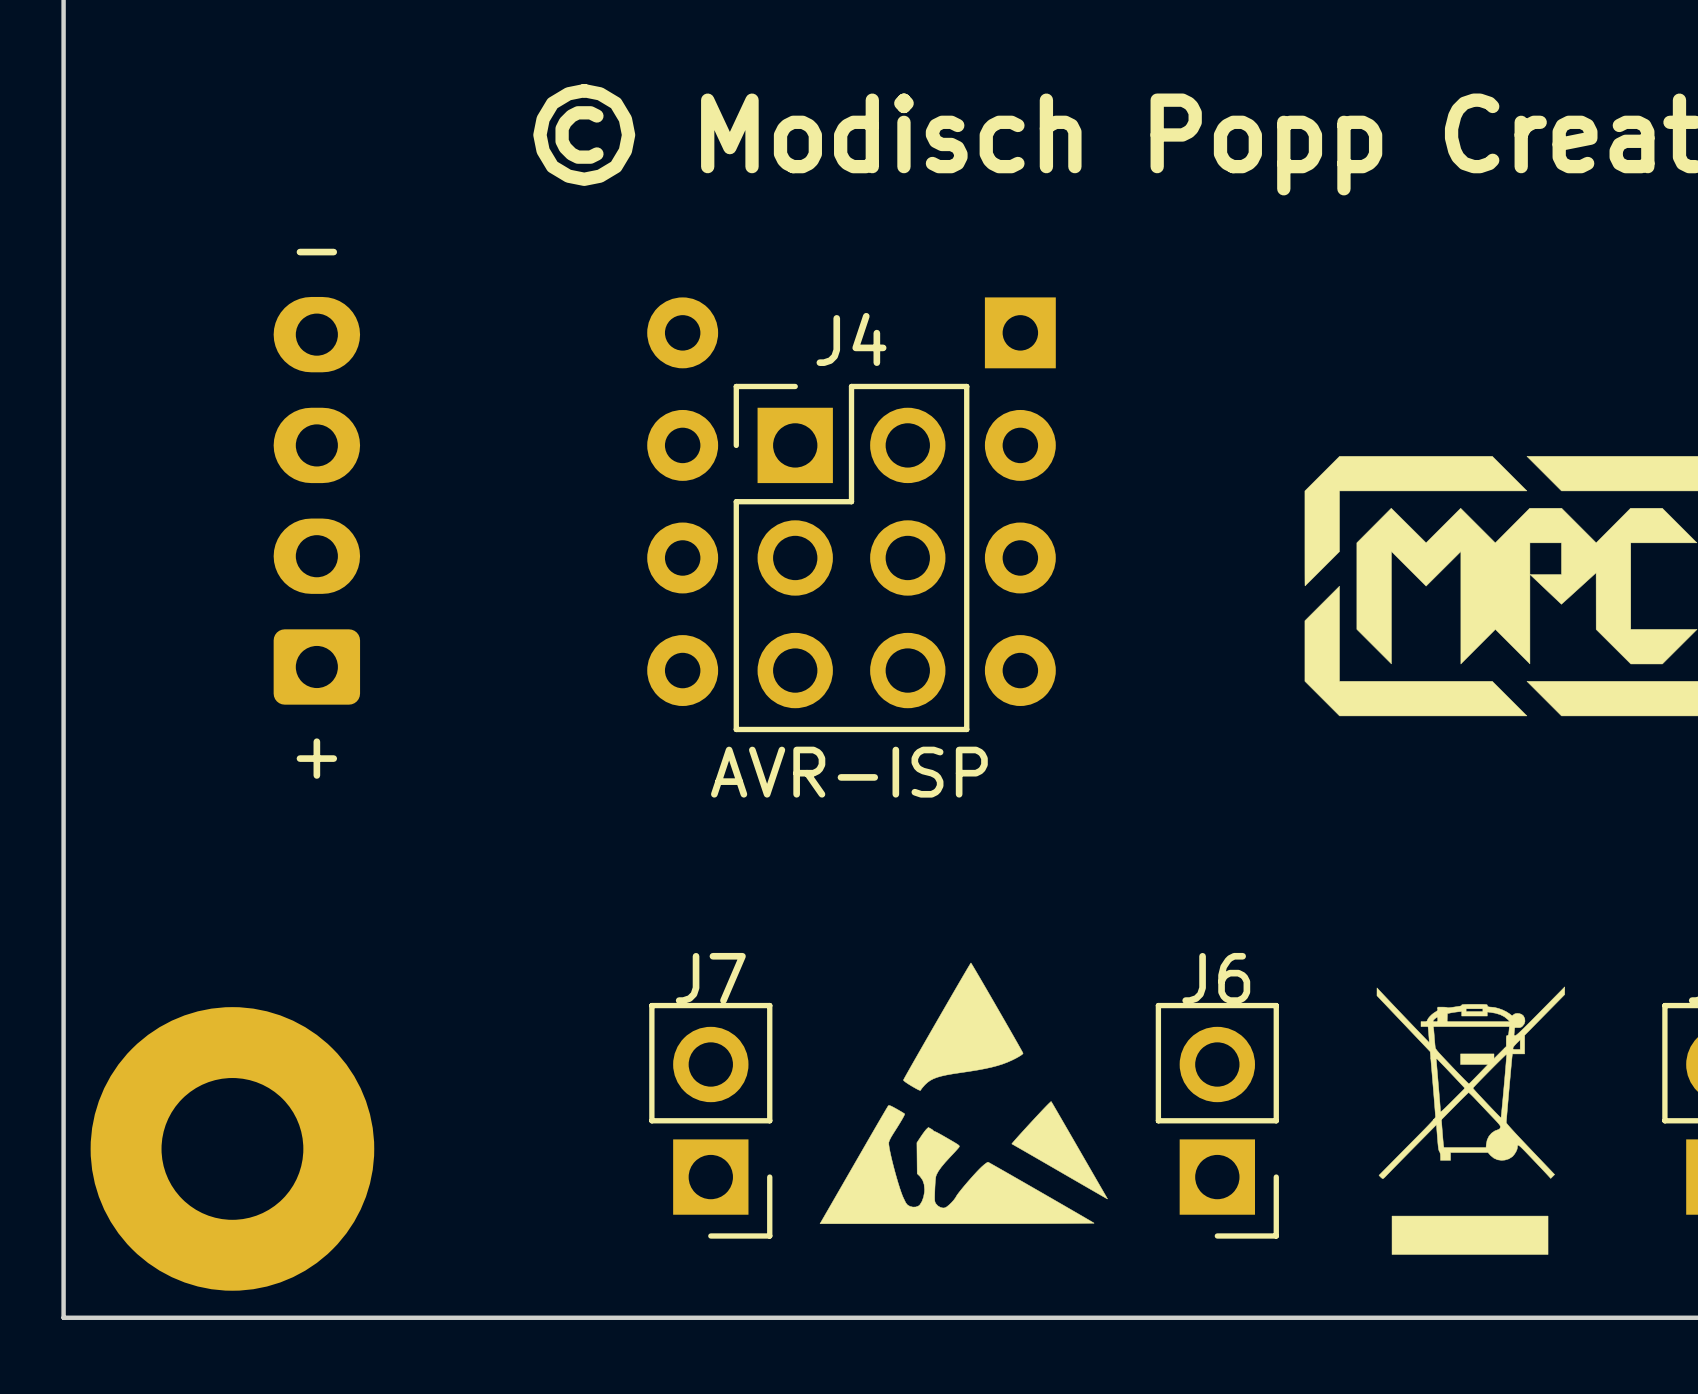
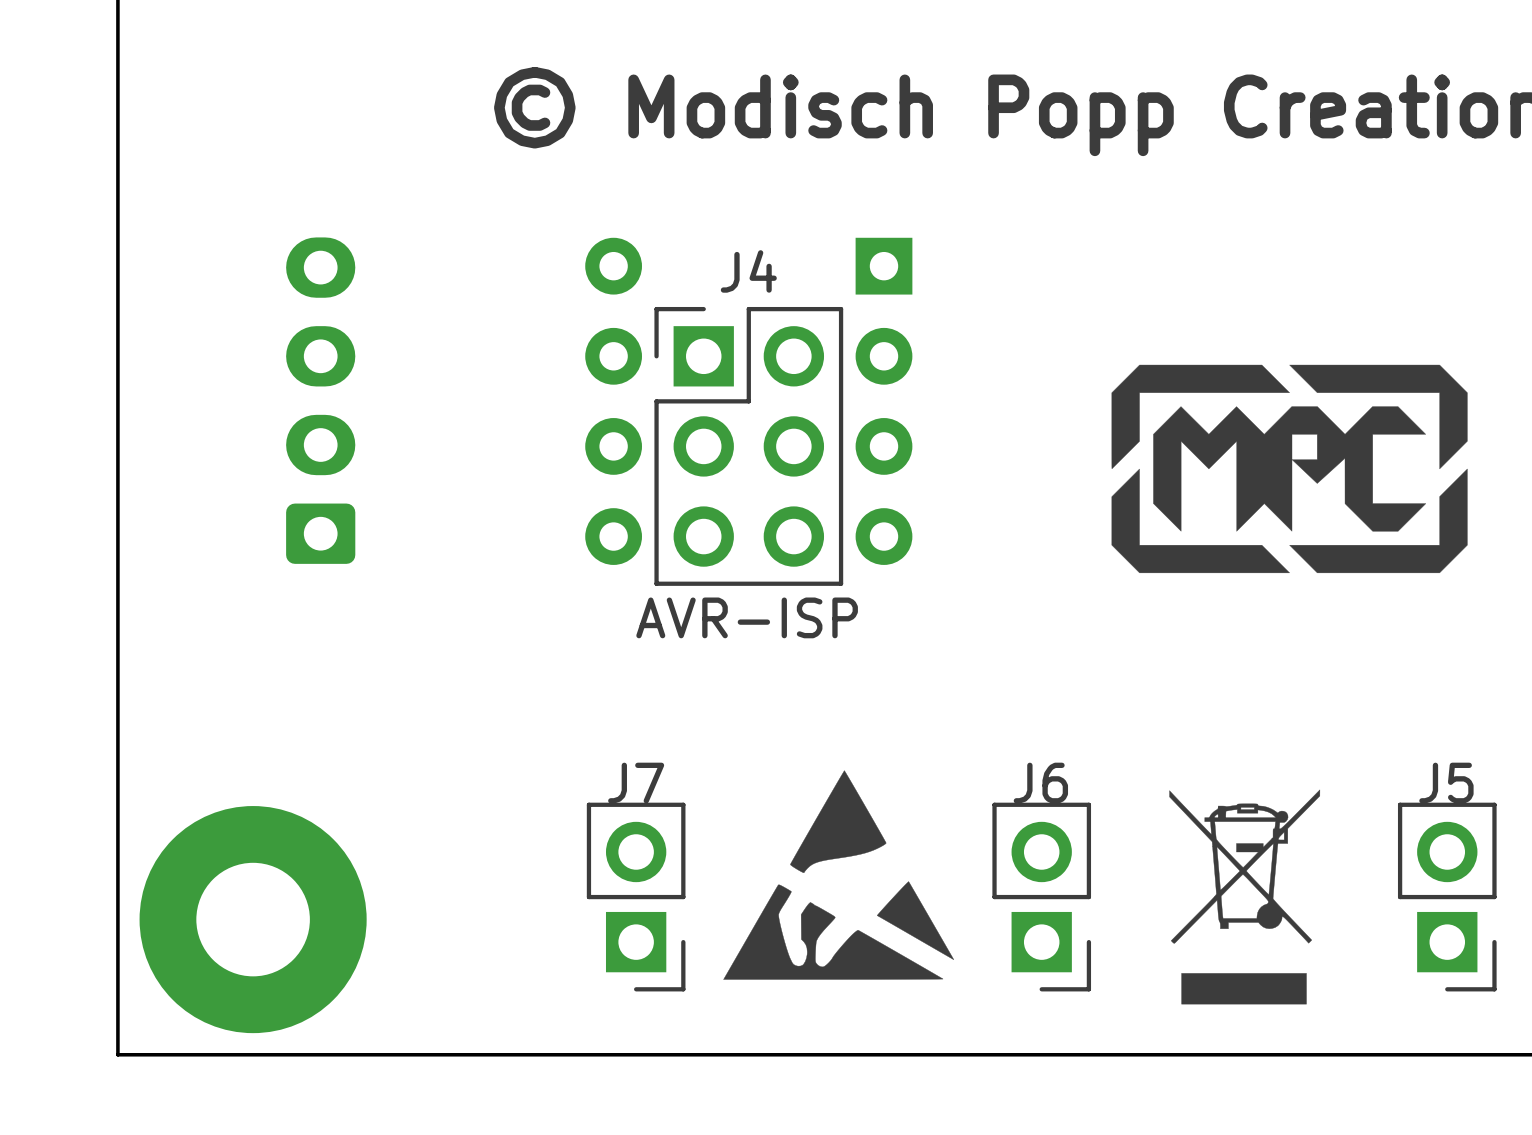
text: - (316, 252) -> none
text: + (316, 758) -> none

